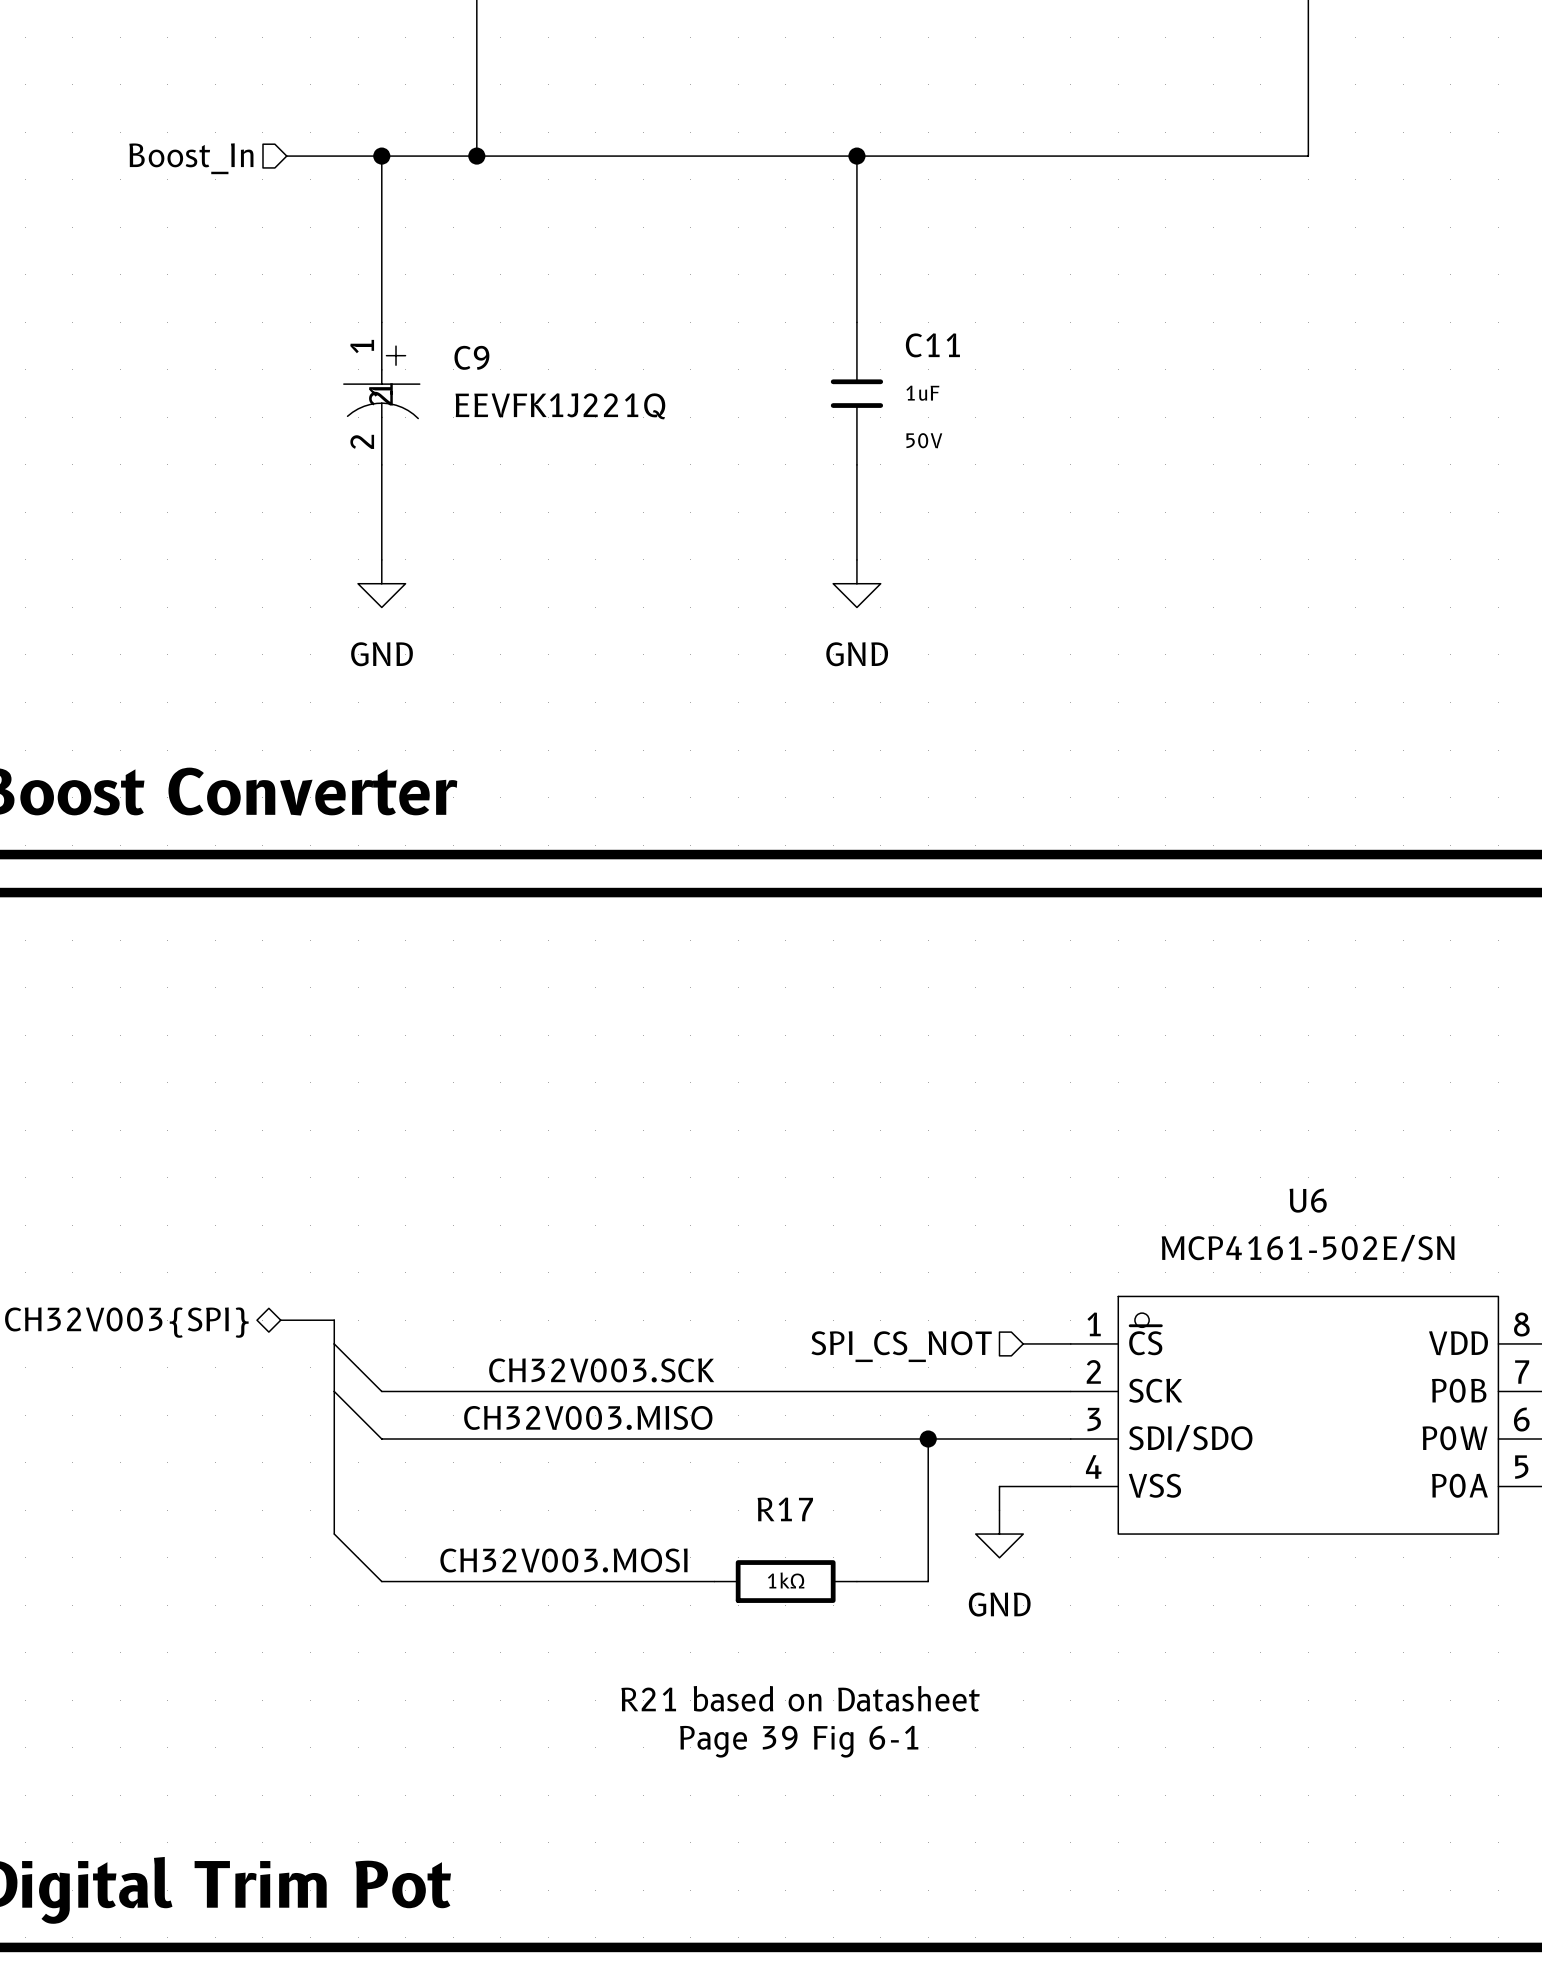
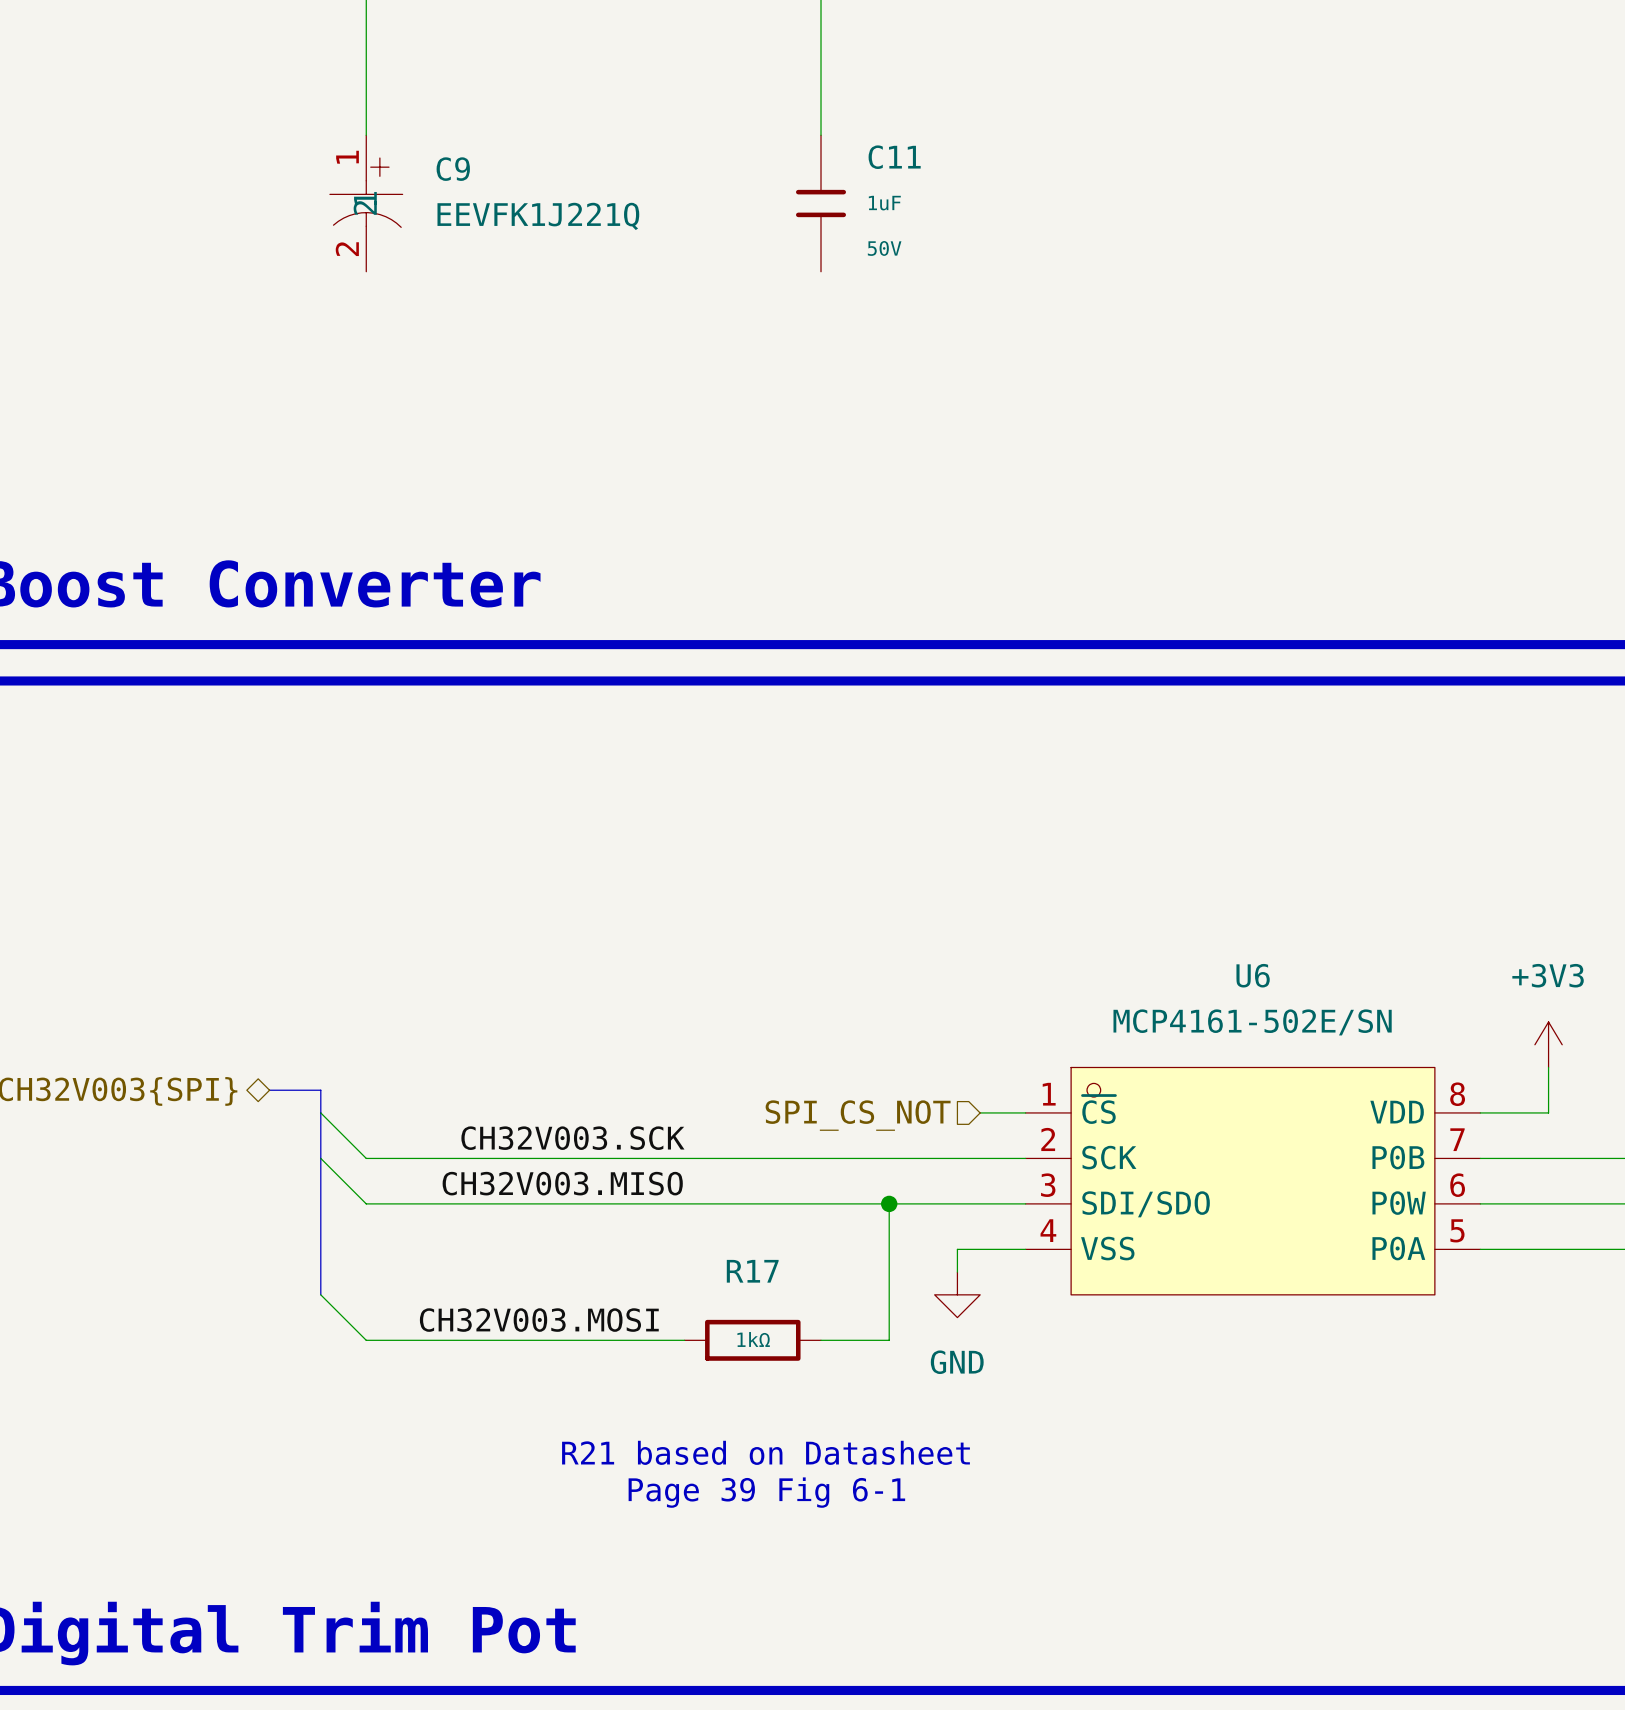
wire: (381, 464) (381, 559) -> none
wire: (856, 464) (856, 559) -> none
power symbol: GND (381, 583) -> none
power symbol: GND (856, 583) -> none

